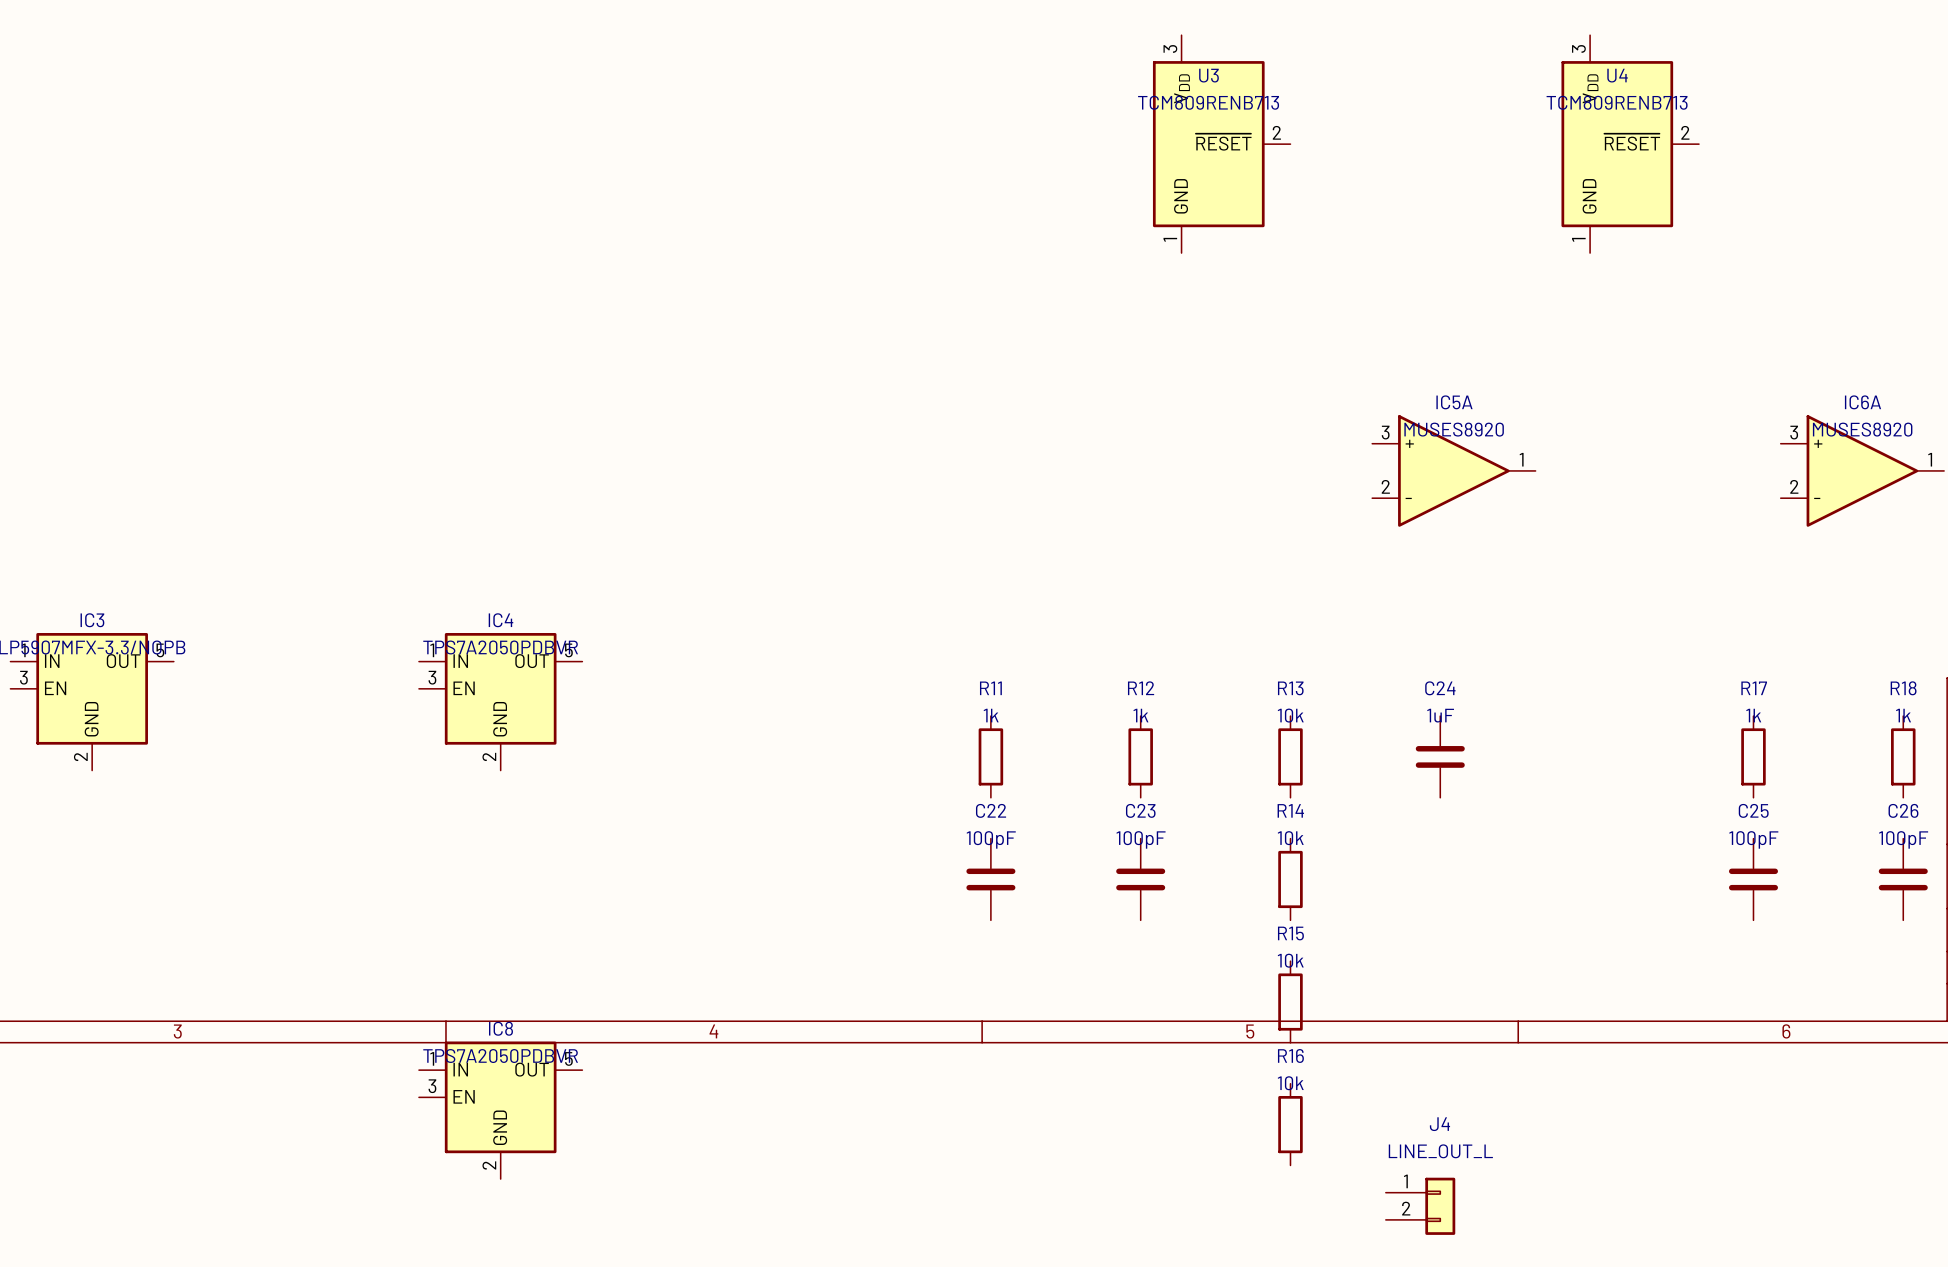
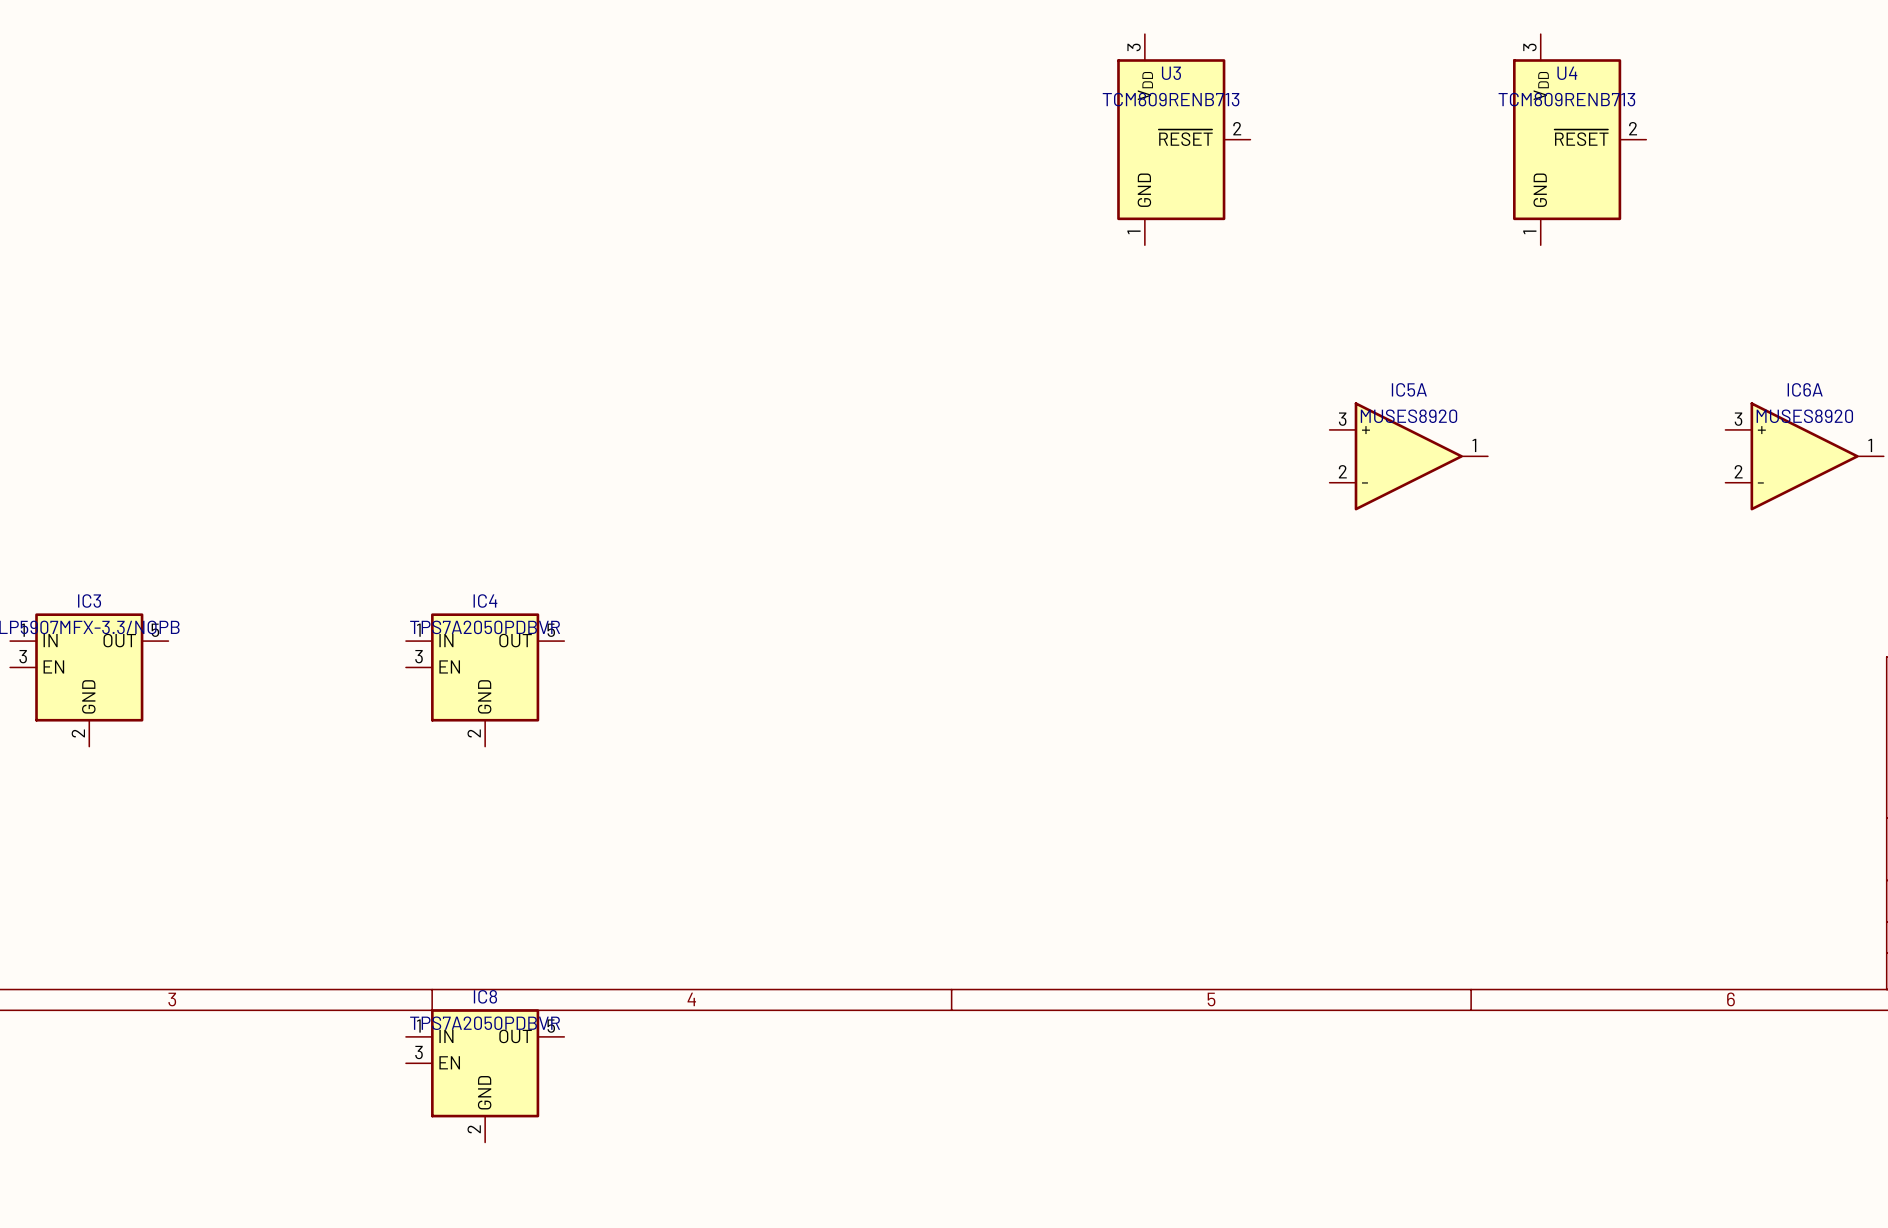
R11: 1k (990, 756) -> none
R12: 1k (1140, 756) -> none
R13: 10k (1290, 756) -> none
C24: 1uF (1440, 756) -> none
R17: 1k (1753, 756) -> none
R18: 1k (1903, 756) -> none
C22: 100pF (990, 879) -> none
C23: 100pF (1140, 879) -> none
R14: 10k (1290, 879) -> none
C25: 100pF (1753, 879) -> none
C26: 100pF (1903, 879) -> none
R15: 10k (1290, 1002) -> none
R16: 10k (1290, 1124) -> none
J4: LINE_OUT_L (1420, 1206) -> none

